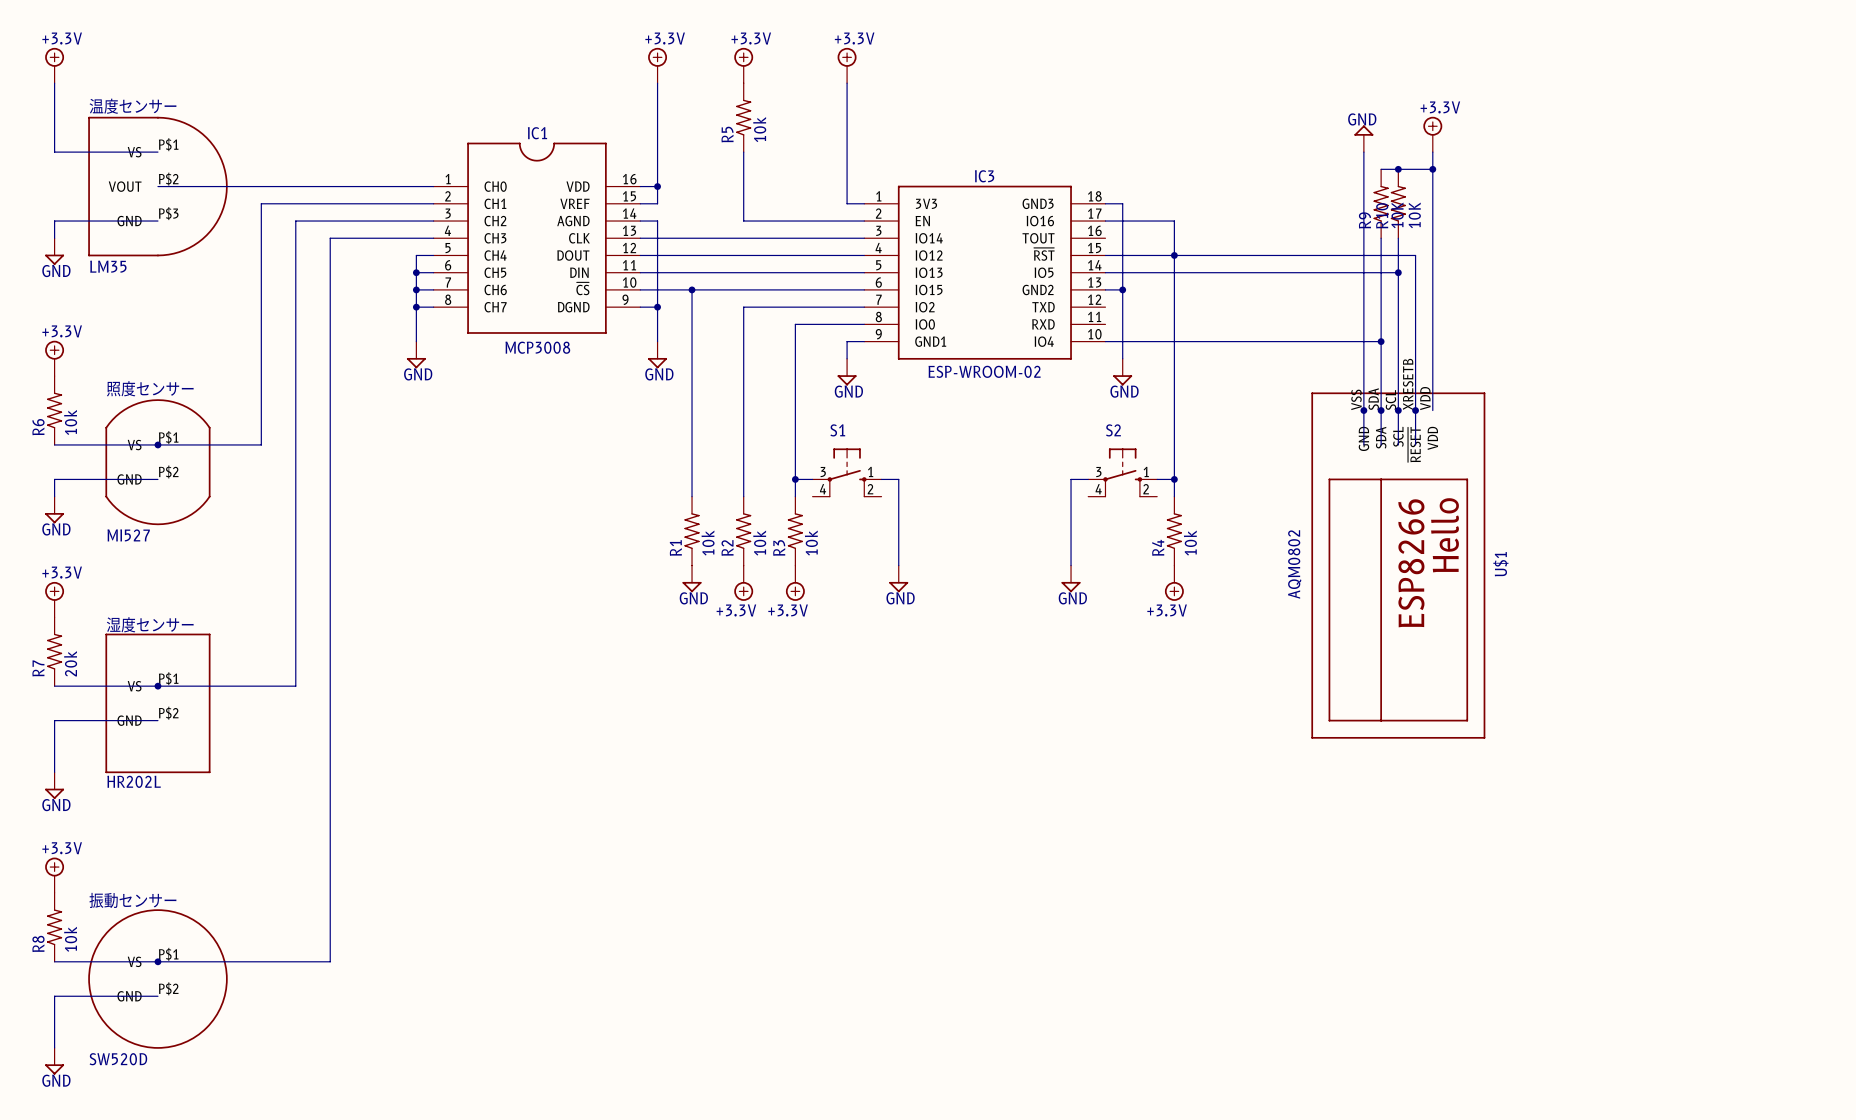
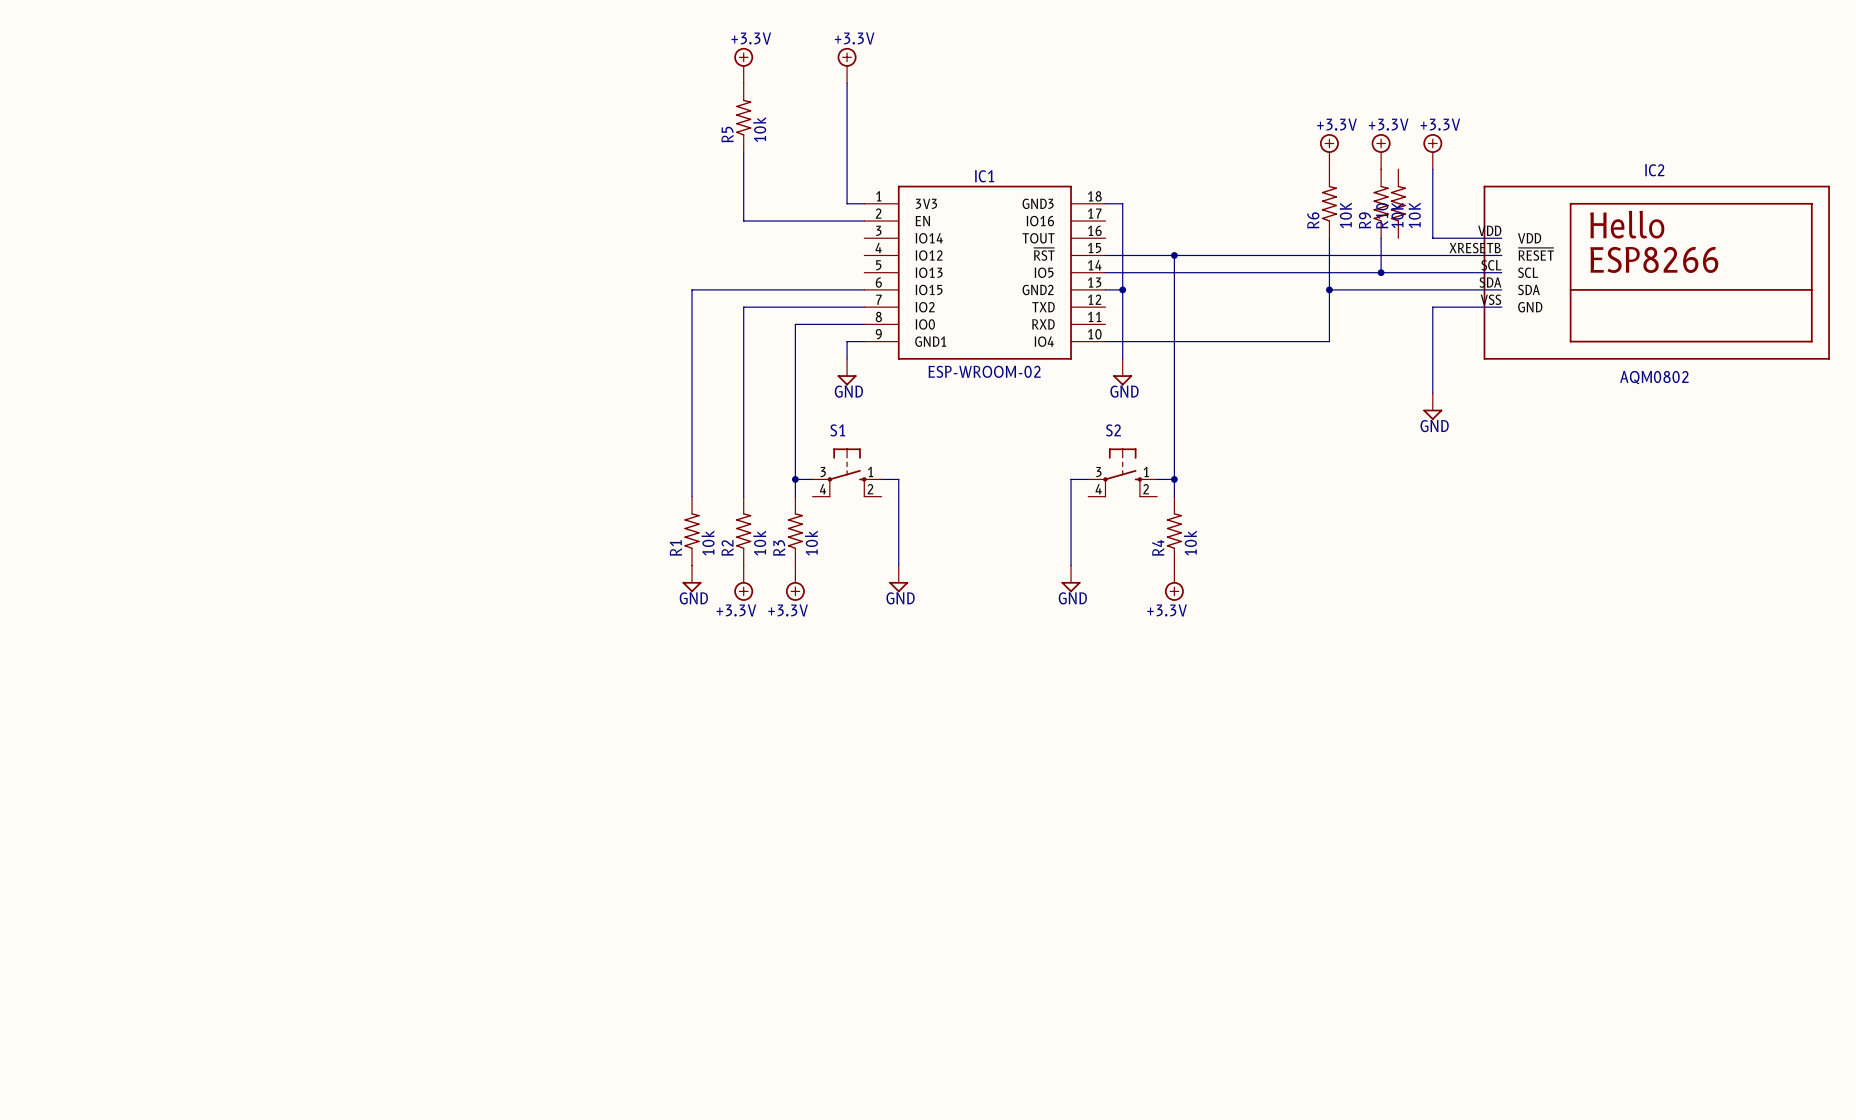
power symbol: +3.3V (54, 65) -> none
power symbol: +3.3V (657, 65) -> none
wire: (54, 83) (54, 152) (157, 152) -> none
wire: (657, 83) (657, 203) (640, 203) -> none
power symbol position: +3.3V (1432, 134) -> +3.3V (1432, 151)
power symbol: GND (1363, 138) -> none
power symbol: none -> +3.3V (1329, 151)
power symbol: none -> +3.3V (1381, 151)
wire: (1363, 152) (1363, 444) -> none
wire: (1432, 152) (1432, 169) (1381, 169) -> none
junction: (1398, 169) -> none
junction: (1432, 169) -> none
IC3 name: IC3 (984, 176) -> IC1 (984, 176)
wire: (157, 186) (433, 186) -> none
温度センサー: LM35 (157, 186) -> none
wire: (640, 186) (657, 186) -> none
junction: (657, 186) -> none
wire: (433, 203) (261, 203) (261, 444) (54, 444) -> none
wire: (157, 221) (54, 221) (54, 238) -> none
wire: (433, 221) (295, 221) (295, 686) (54, 686) -> none
wire: (640, 221) (657, 221) (657, 341) -> none
wire: (1105, 221) (1174, 221) (1174, 255) -> none
wire: (433, 238) (330, 238) (330, 961) (54, 961) -> none
IC1: MCP3008 (536, 238) -> none
wire: (640, 238) (864, 238) -> none
wire: (1398, 238) (1398, 444) -> none
wire: (1432, 238) (1432, 307) -> (1432, 238) (1501, 238)
power symbol: GND (54, 251) -> none
wire: (433, 255) (416, 255) (416, 341) -> none
wire: (640, 255) (864, 255) -> none
wire: (1415, 255) (1415, 444) -> (1415, 255) (1501, 255)
wire: (416, 272) (433, 272) -> none
junction: (416, 272) -> none
wire: (640, 272) (864, 272) -> none
wire: (1381, 272) (1381, 444) -> none
wire: none -> (1398, 272) (1501, 272)
junction position: (1398, 272) -> (1381, 272)
IC2: none -> AQM0802 (1656, 272)
wire: (416, 289) (433, 289) -> none
junction: (416, 289) -> none
wire: (640, 289) (692, 289) -> none
junction: (692, 289) -> none
wire: none -> (1329, 289) (1501, 289)
junction: none -> (1329, 289)
wire: (416, 307) (433, 307) -> none
junction: (416, 307) -> none
wire: (640, 307) (657, 307) -> none
junction: (657, 307) -> none
wire: none -> (1432, 307) (1501, 307)
wire: (1329, 341) (1381, 341) -> (1329, 341) (1329, 238)
junction: (1381, 341) -> none
power symbol: GND (416, 354) -> none
power symbol: GND (657, 354) -> none
power symbol: +3.3V (54, 358) -> none
power symbol: none -> GND (1432, 406)
R6 position: (54, 410) -> (1329, 203)
junction: (1363, 410) -> none
junction: (1381, 410) -> none
junction: (1398, 410) -> none
junction: (1415, 410) -> none
R6 value: 10k (70, 422) -> 10K (1345, 215)
junction: (157, 444) -> none
照度センサー: MI527 (157, 462) -> none
wire: (157, 479) (54, 479) (54, 496) -> none
power symbol: GND (54, 510) -> none
U$1: AQM0802 (1398, 565) -> none
power symbol: +3.3V (54, 599) -> none
R7: 20k (54, 651) -> none
junction: (157, 686) -> none
湿度センサー: HR202L (157, 703) -> none
wire: (157, 720) (54, 720) (54, 772) -> none
power symbol: GND (54, 785) -> none
power symbol: +3.3V (54, 875) -> none
R8: 10k (54, 927) -> none
junction: (157, 961) -> none
振動センサー: SW520D (157, 979) -> none
wire: (157, 996) (54, 996) (54, 1047) -> none
power symbol: GND (54, 1061) -> none

